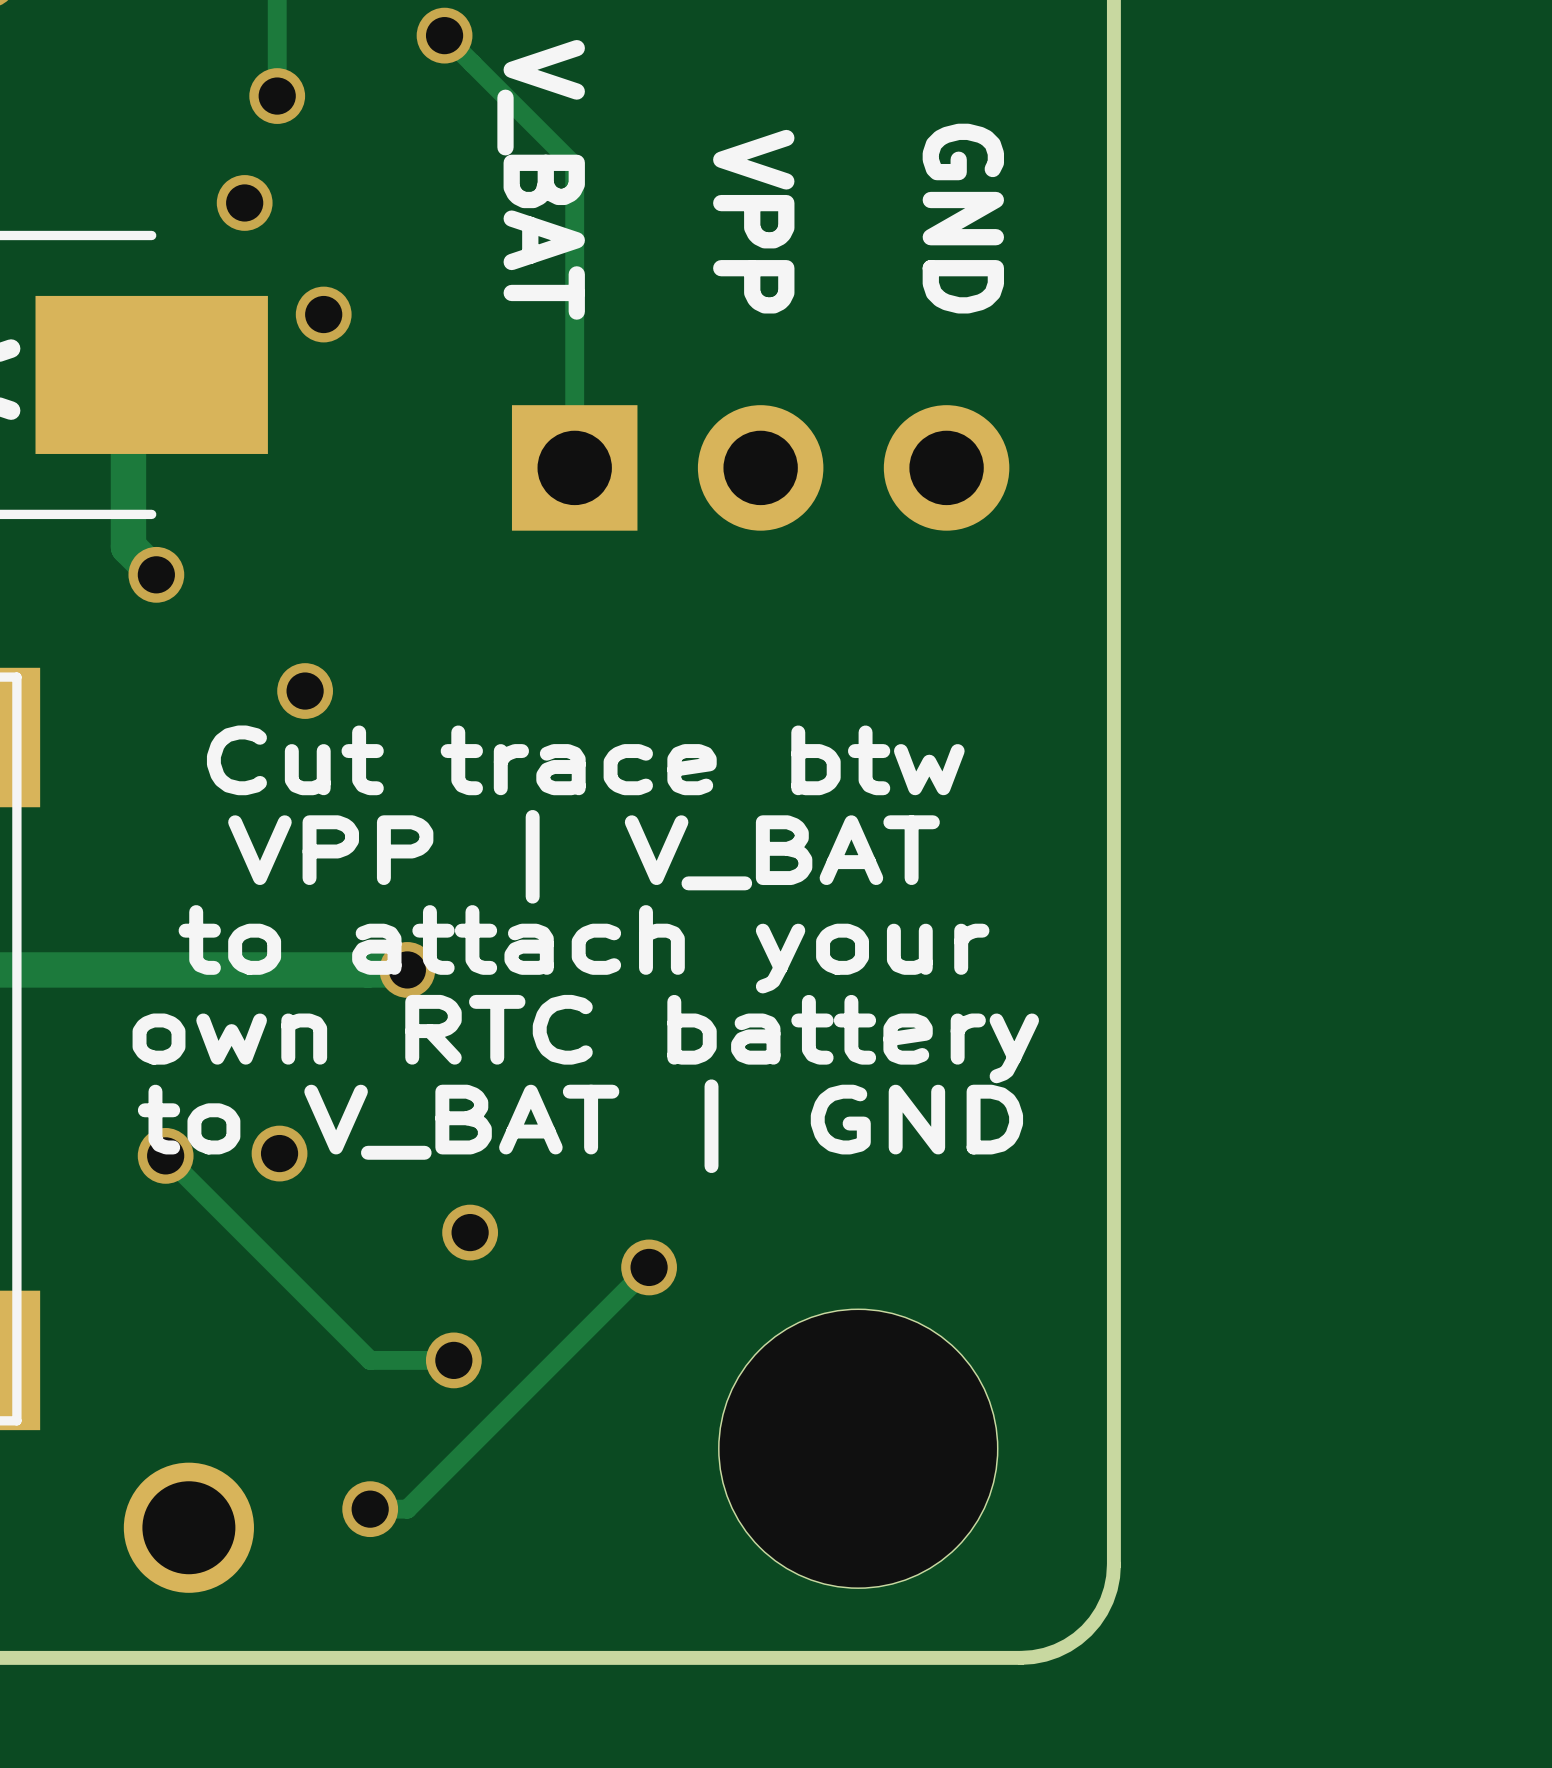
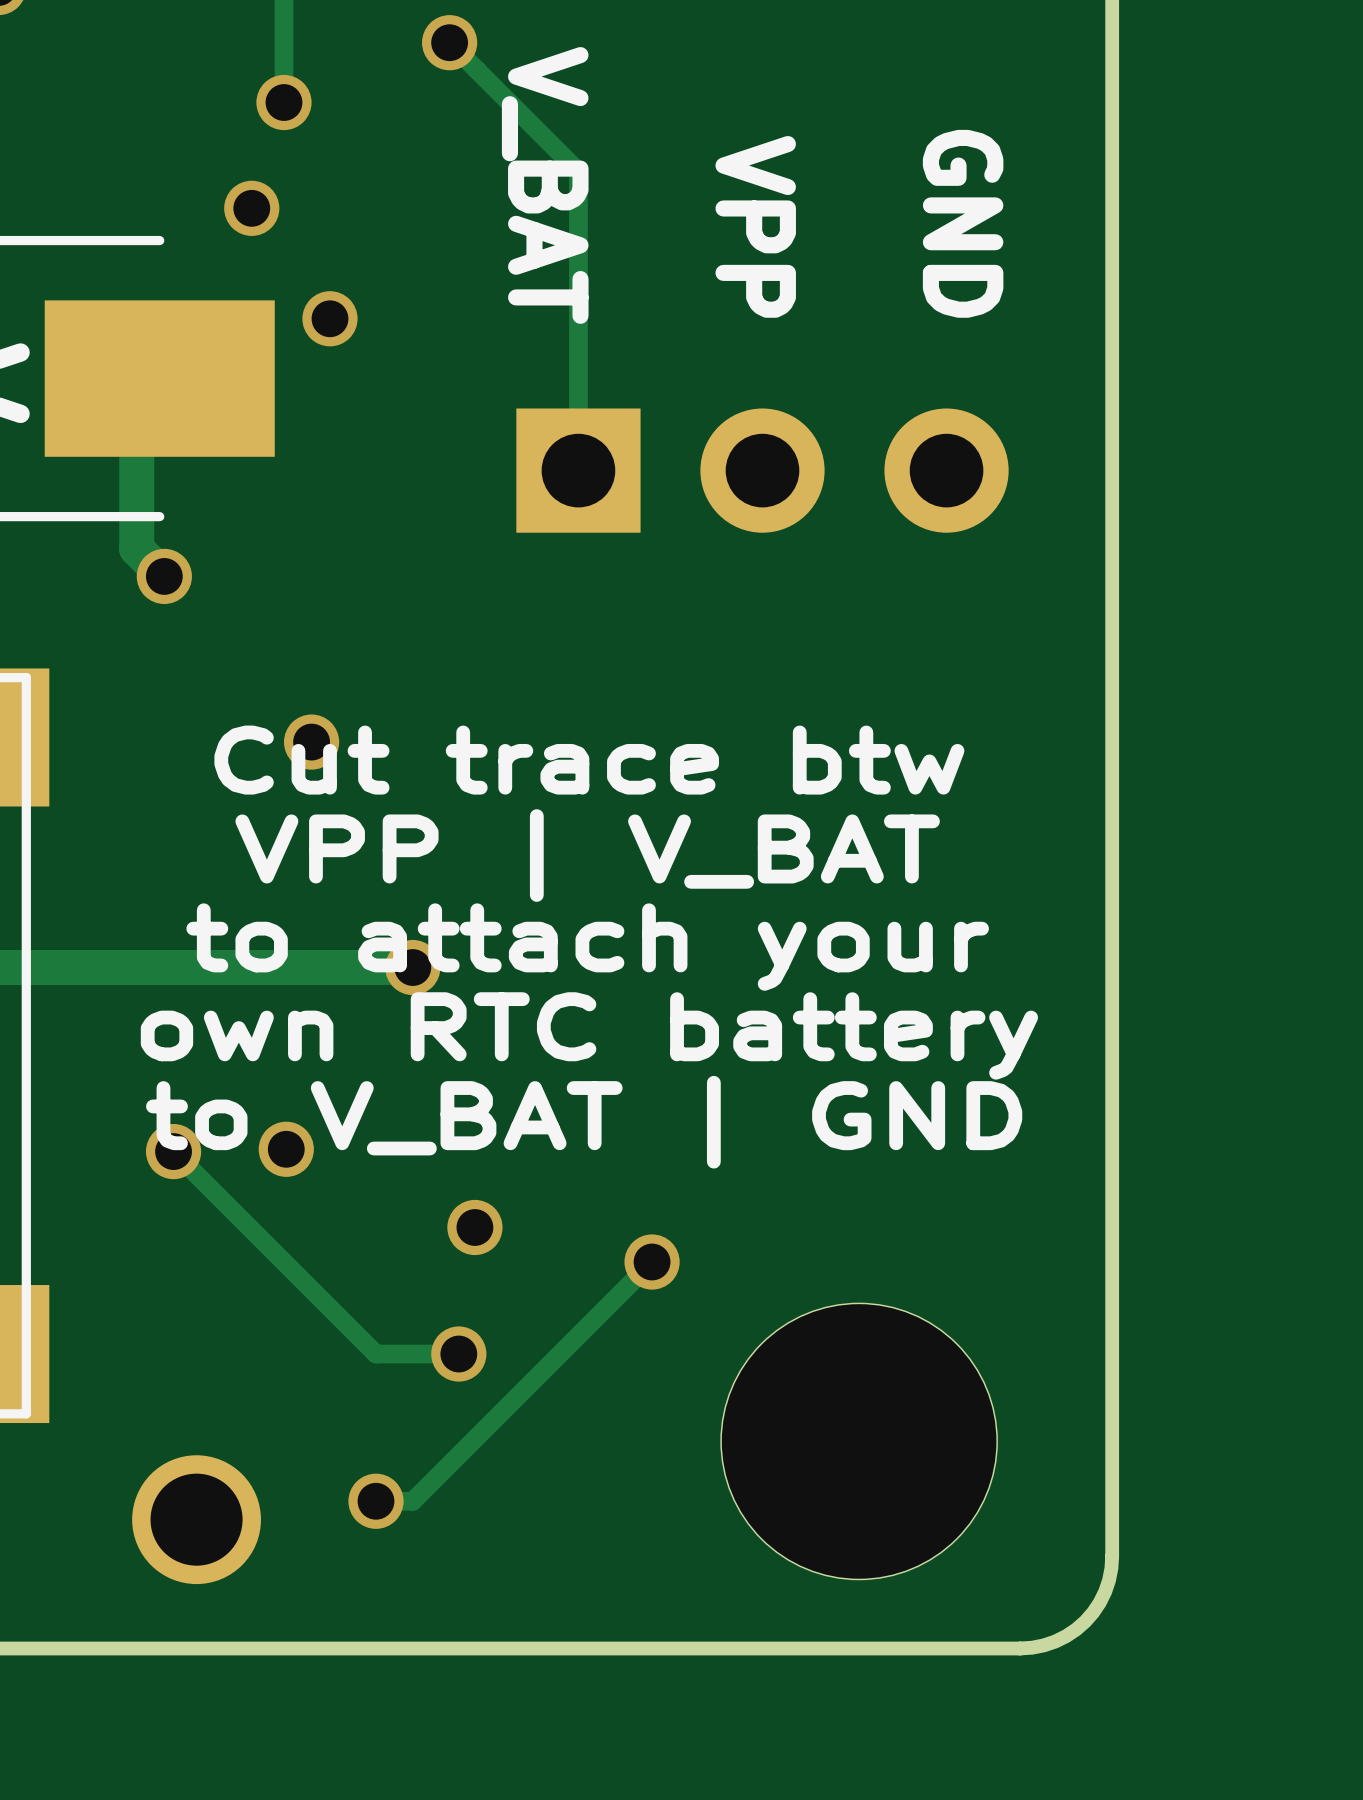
via position: (305, 691) -> (311, 742)

